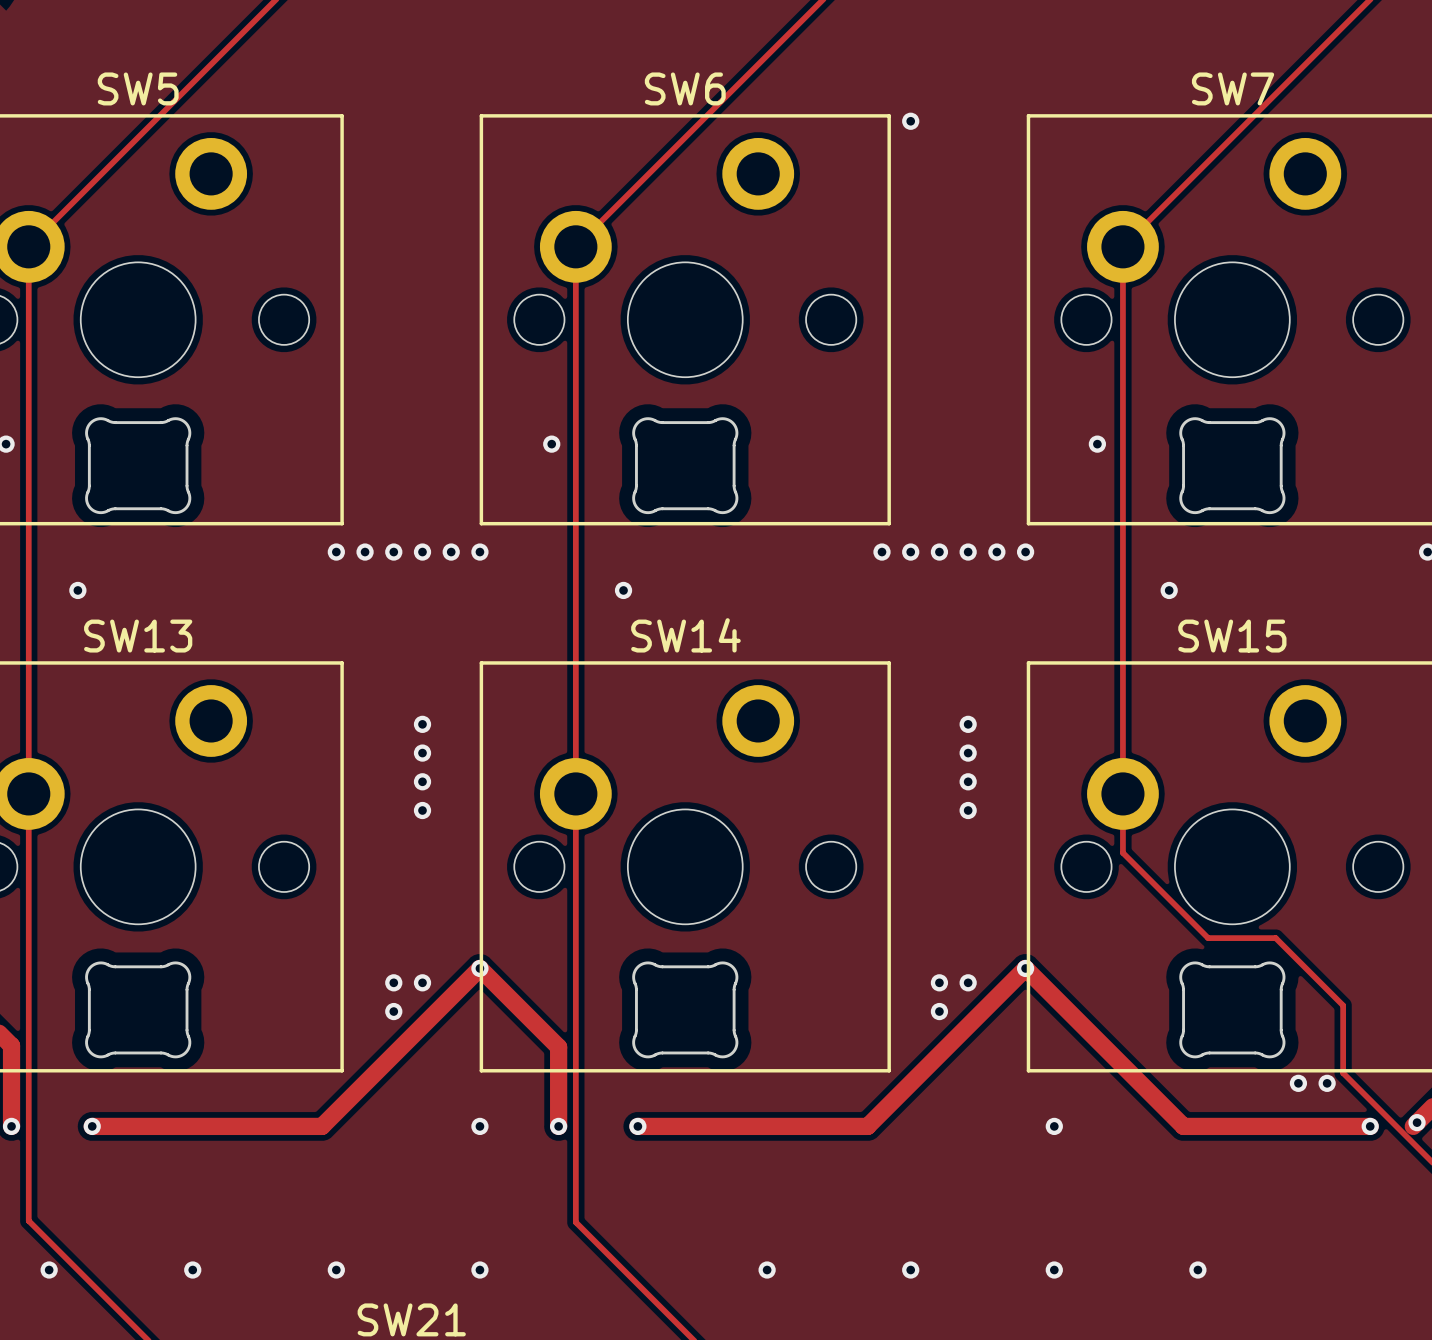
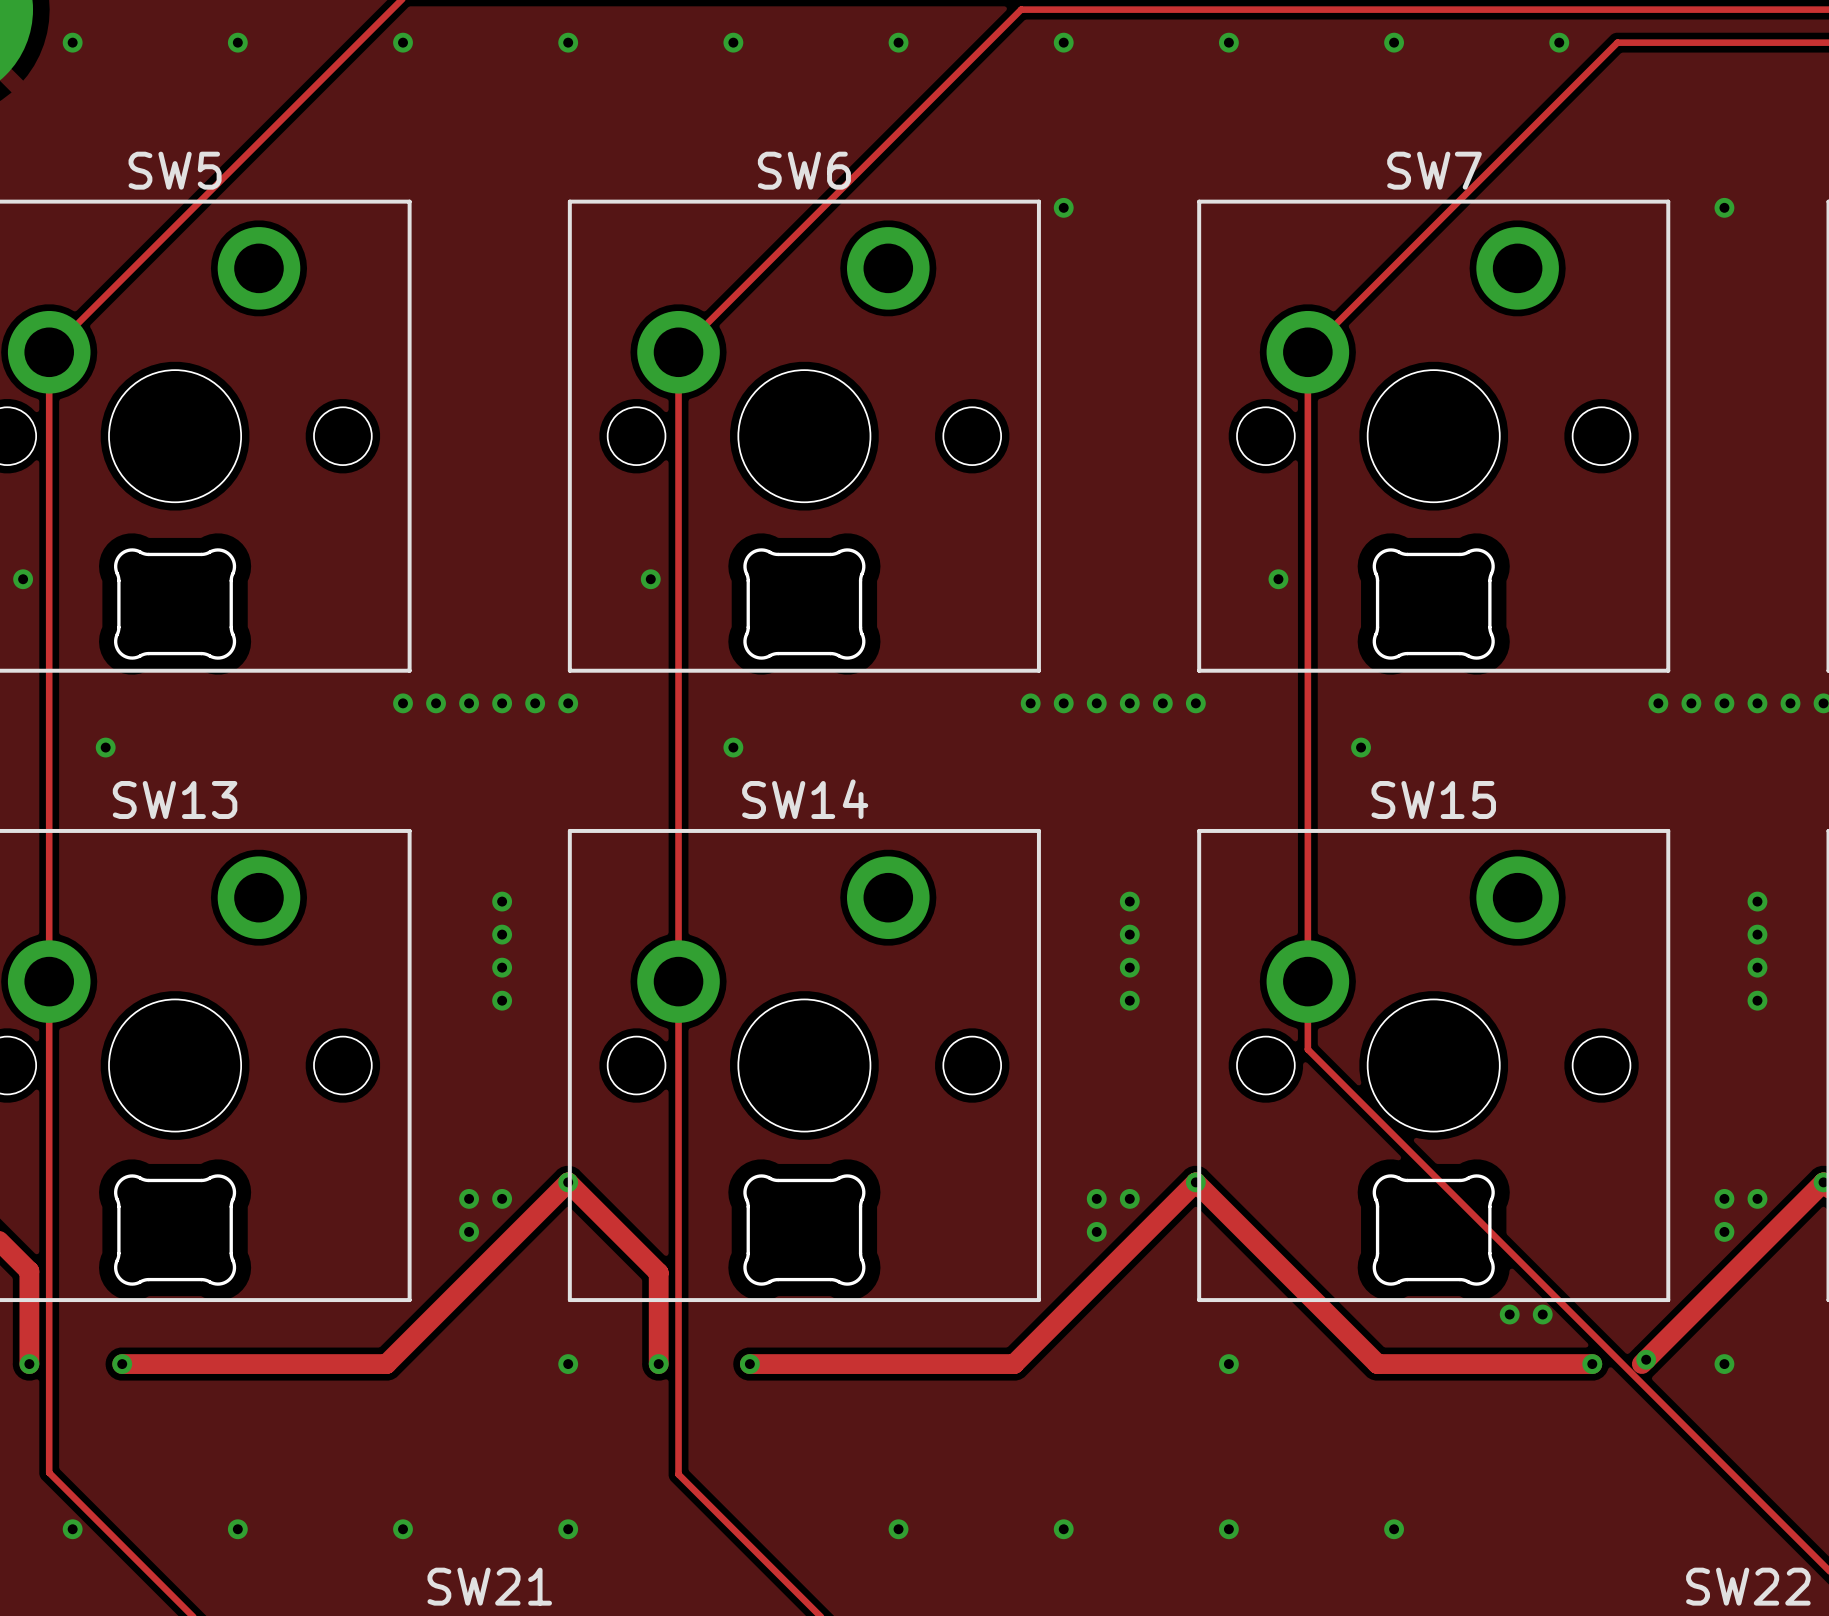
track: (1208, 938) (1275, 938) (1343, 1005) (1343, 1073) -> (1405, 1147) (1561, 1302)

